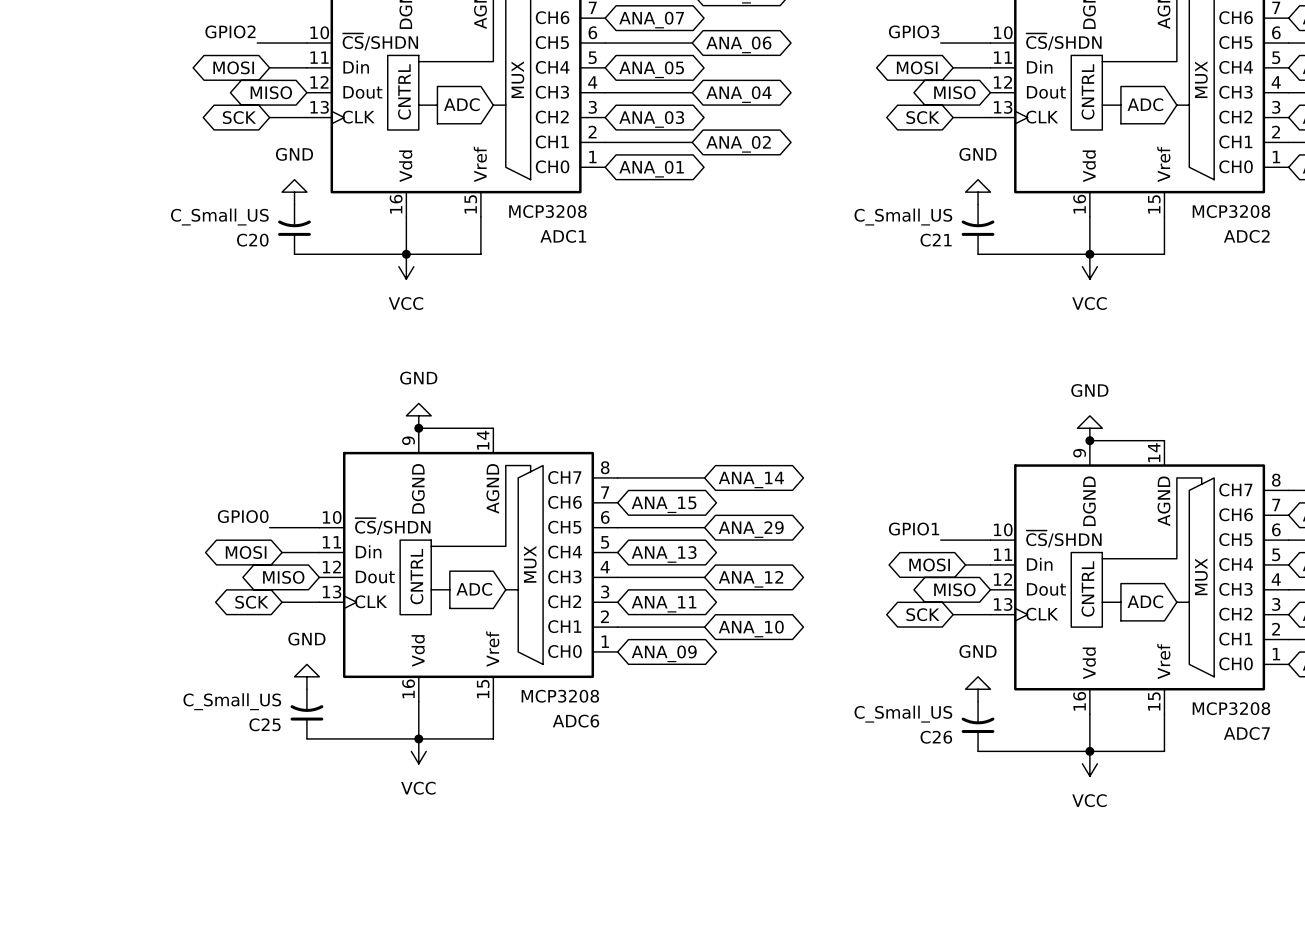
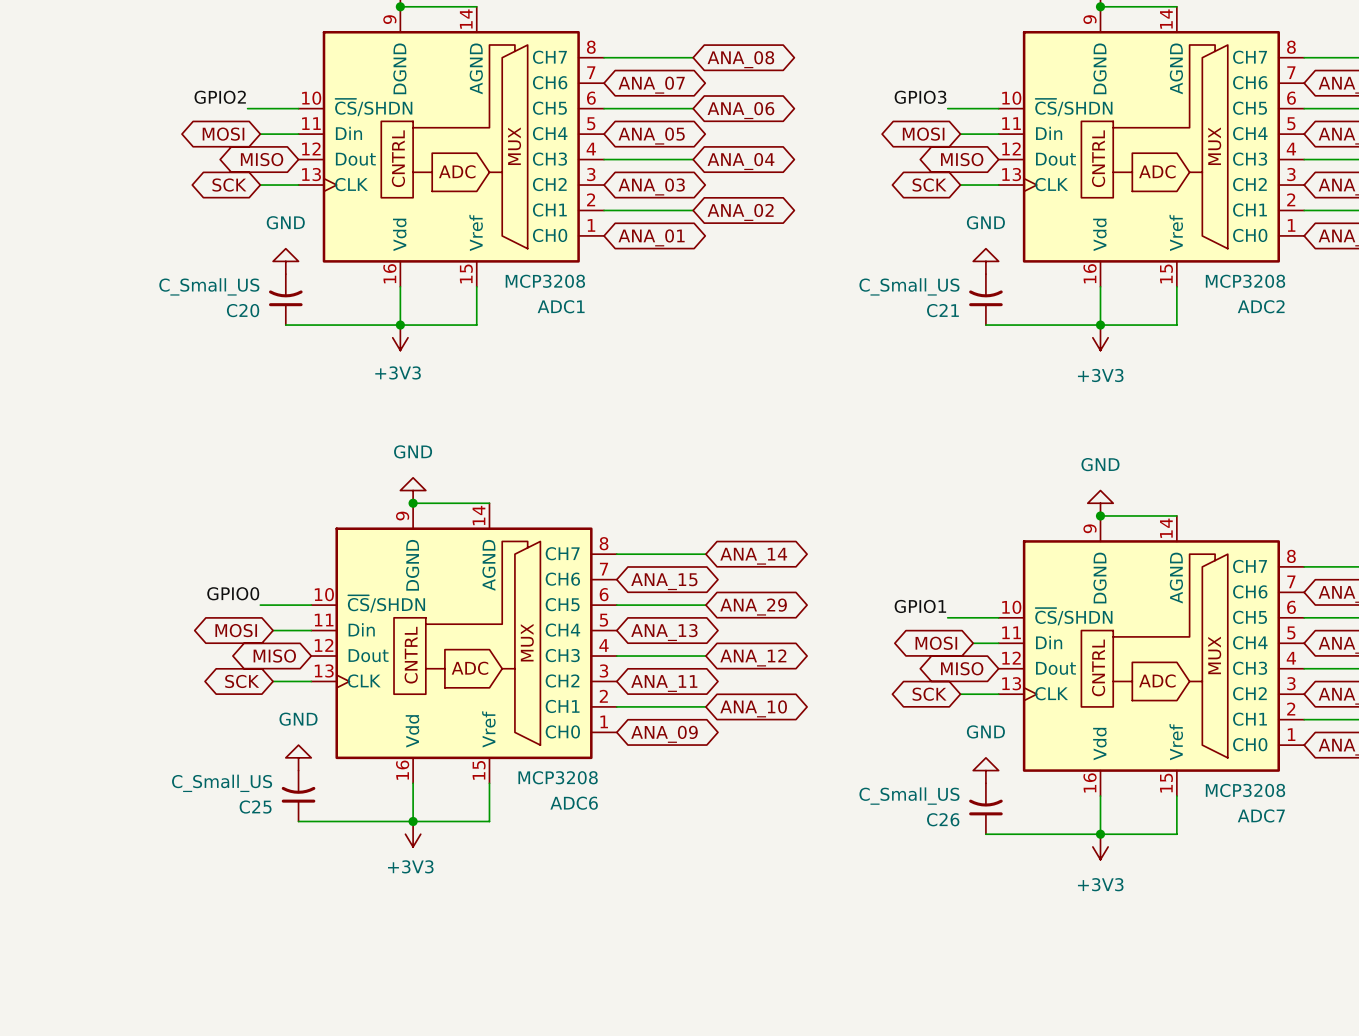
power symbol: VCC (406, 266) -> +3V3 (400, 337)
power symbol: VCC (1089, 266) -> +3V3 (1100, 337)
power symbol: VCC (418, 751) -> +3V3 (413, 834)
power symbol: VCC (1089, 763) -> +3V3 (1100, 846)

